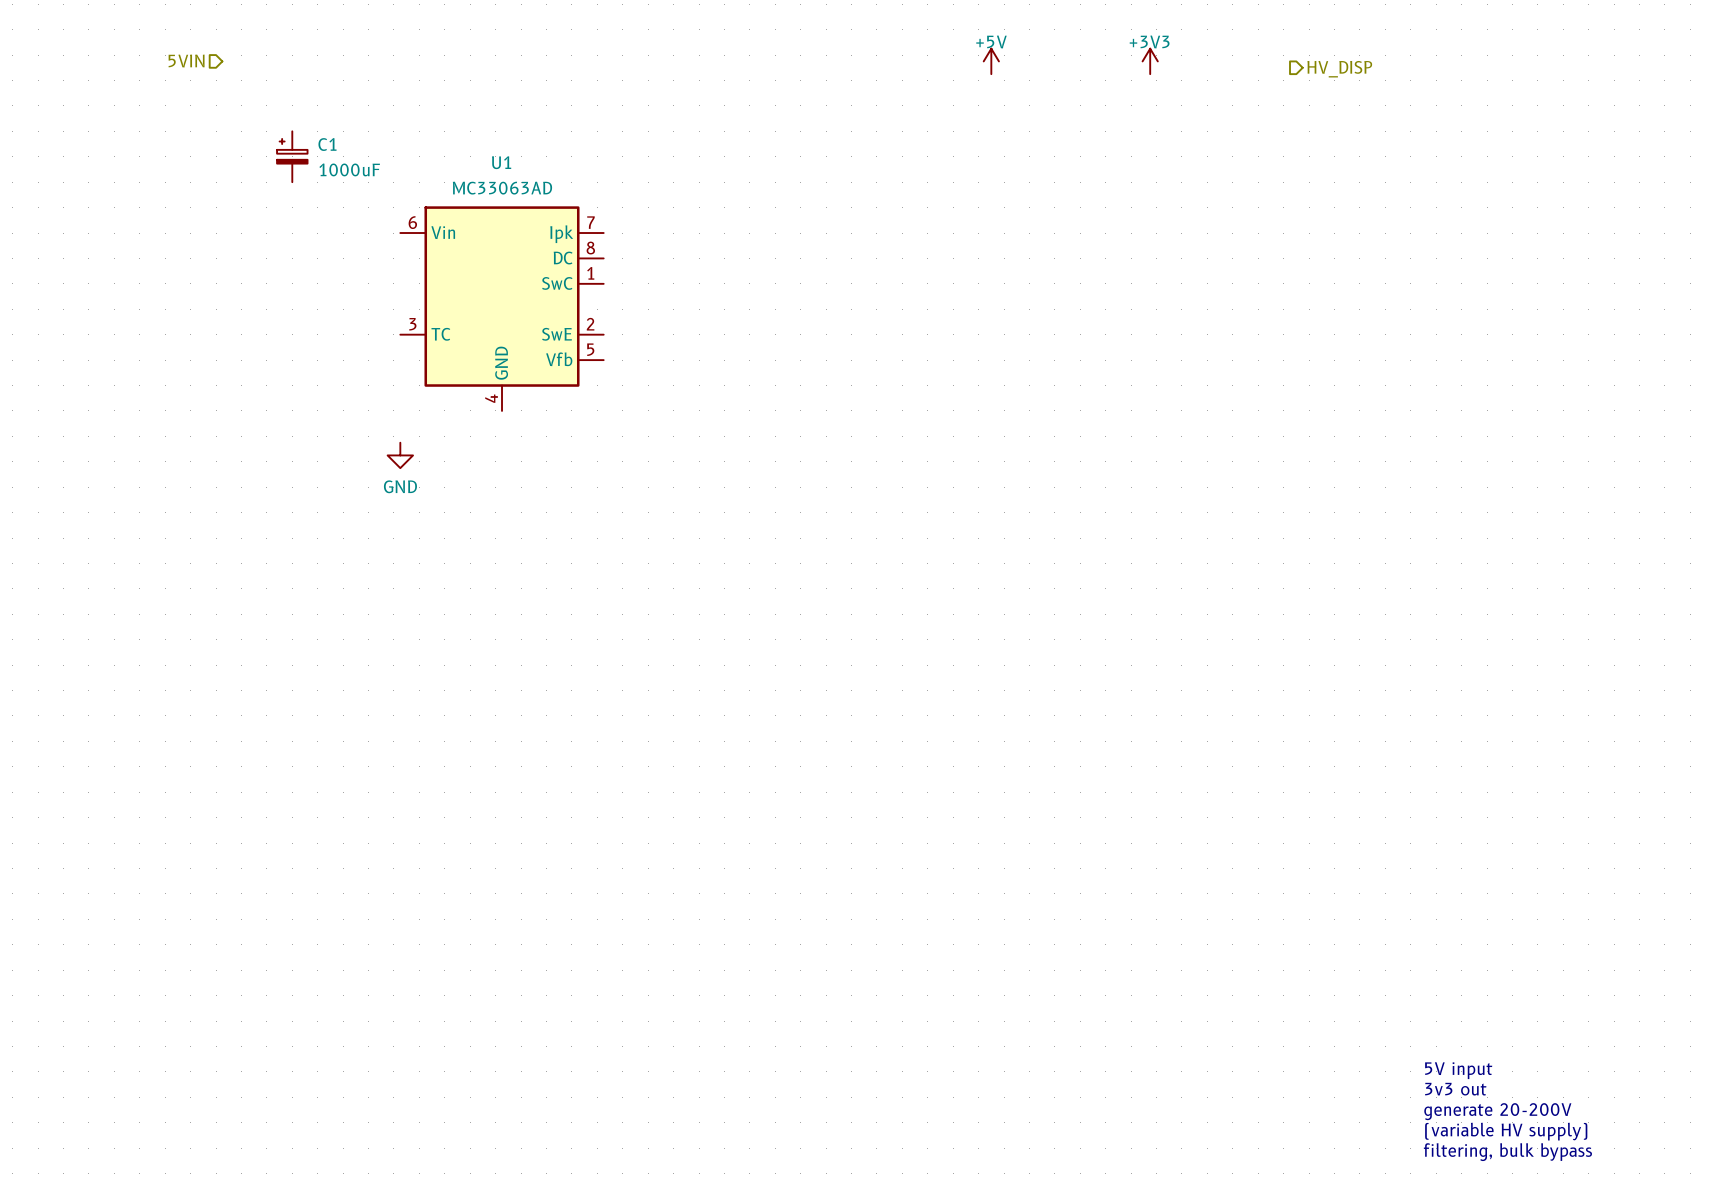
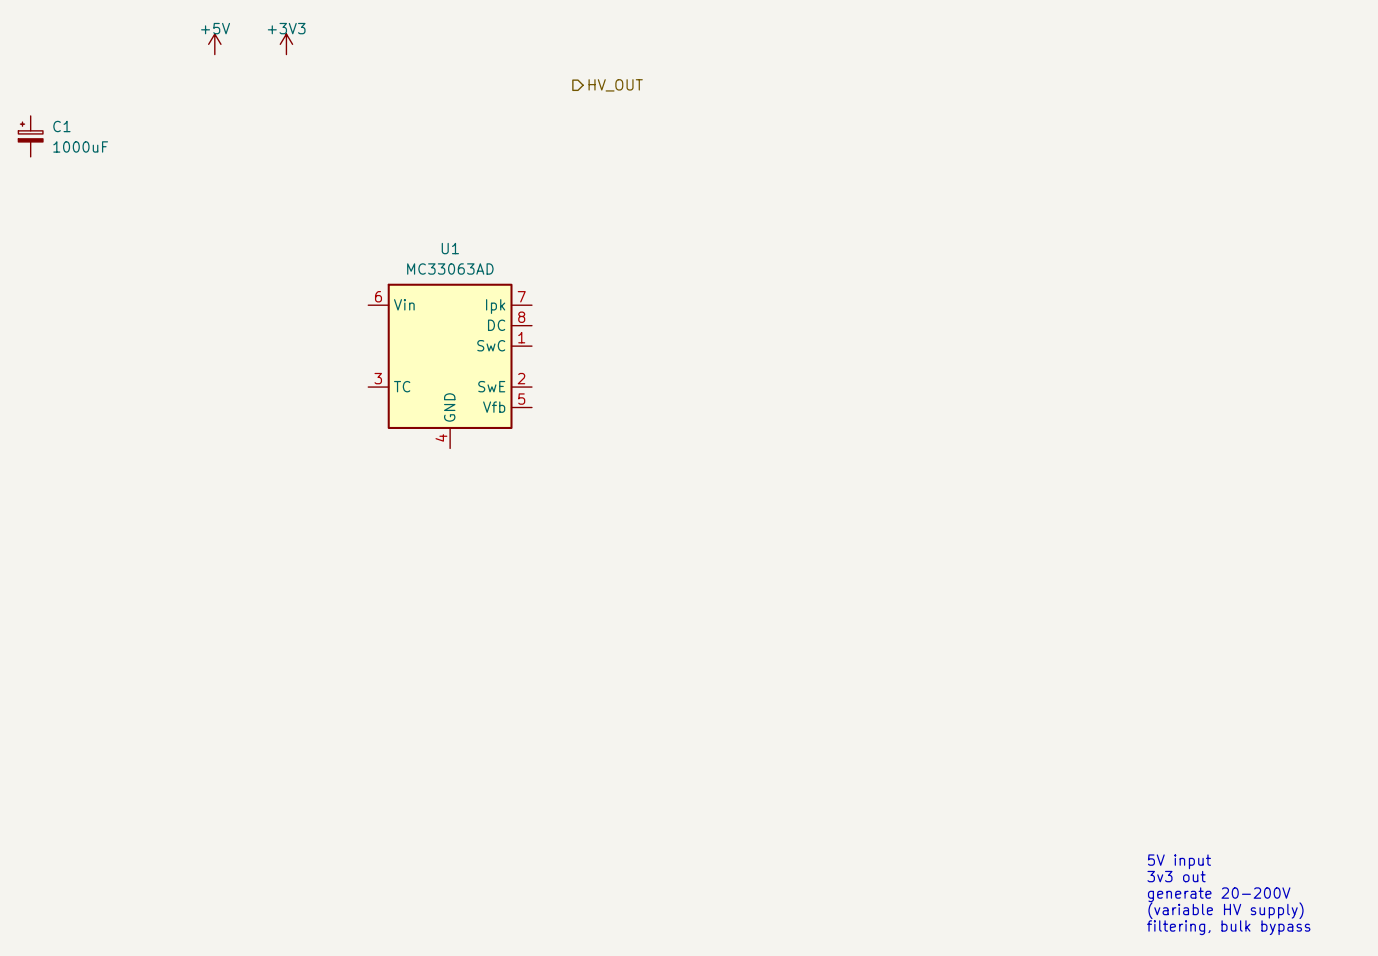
power symbol: none -> +5V (214, 44)
power symbol: none -> +3V3 (286, 44)
hierarchical label: 5VIN (186, 61) -> none
power symbol: +5V (991, 61) -> none
power symbol: +3V3 (1150, 61) -> none
hierarchical label: HV_DISP (1339, 69) -> none
hierarchical label: none -> HV_OUT (615, 85)
C1 position: (292, 156) -> (30, 136)
U1 position: (502, 308) -> (450, 366)
power symbol: GND (400, 455) -> none

